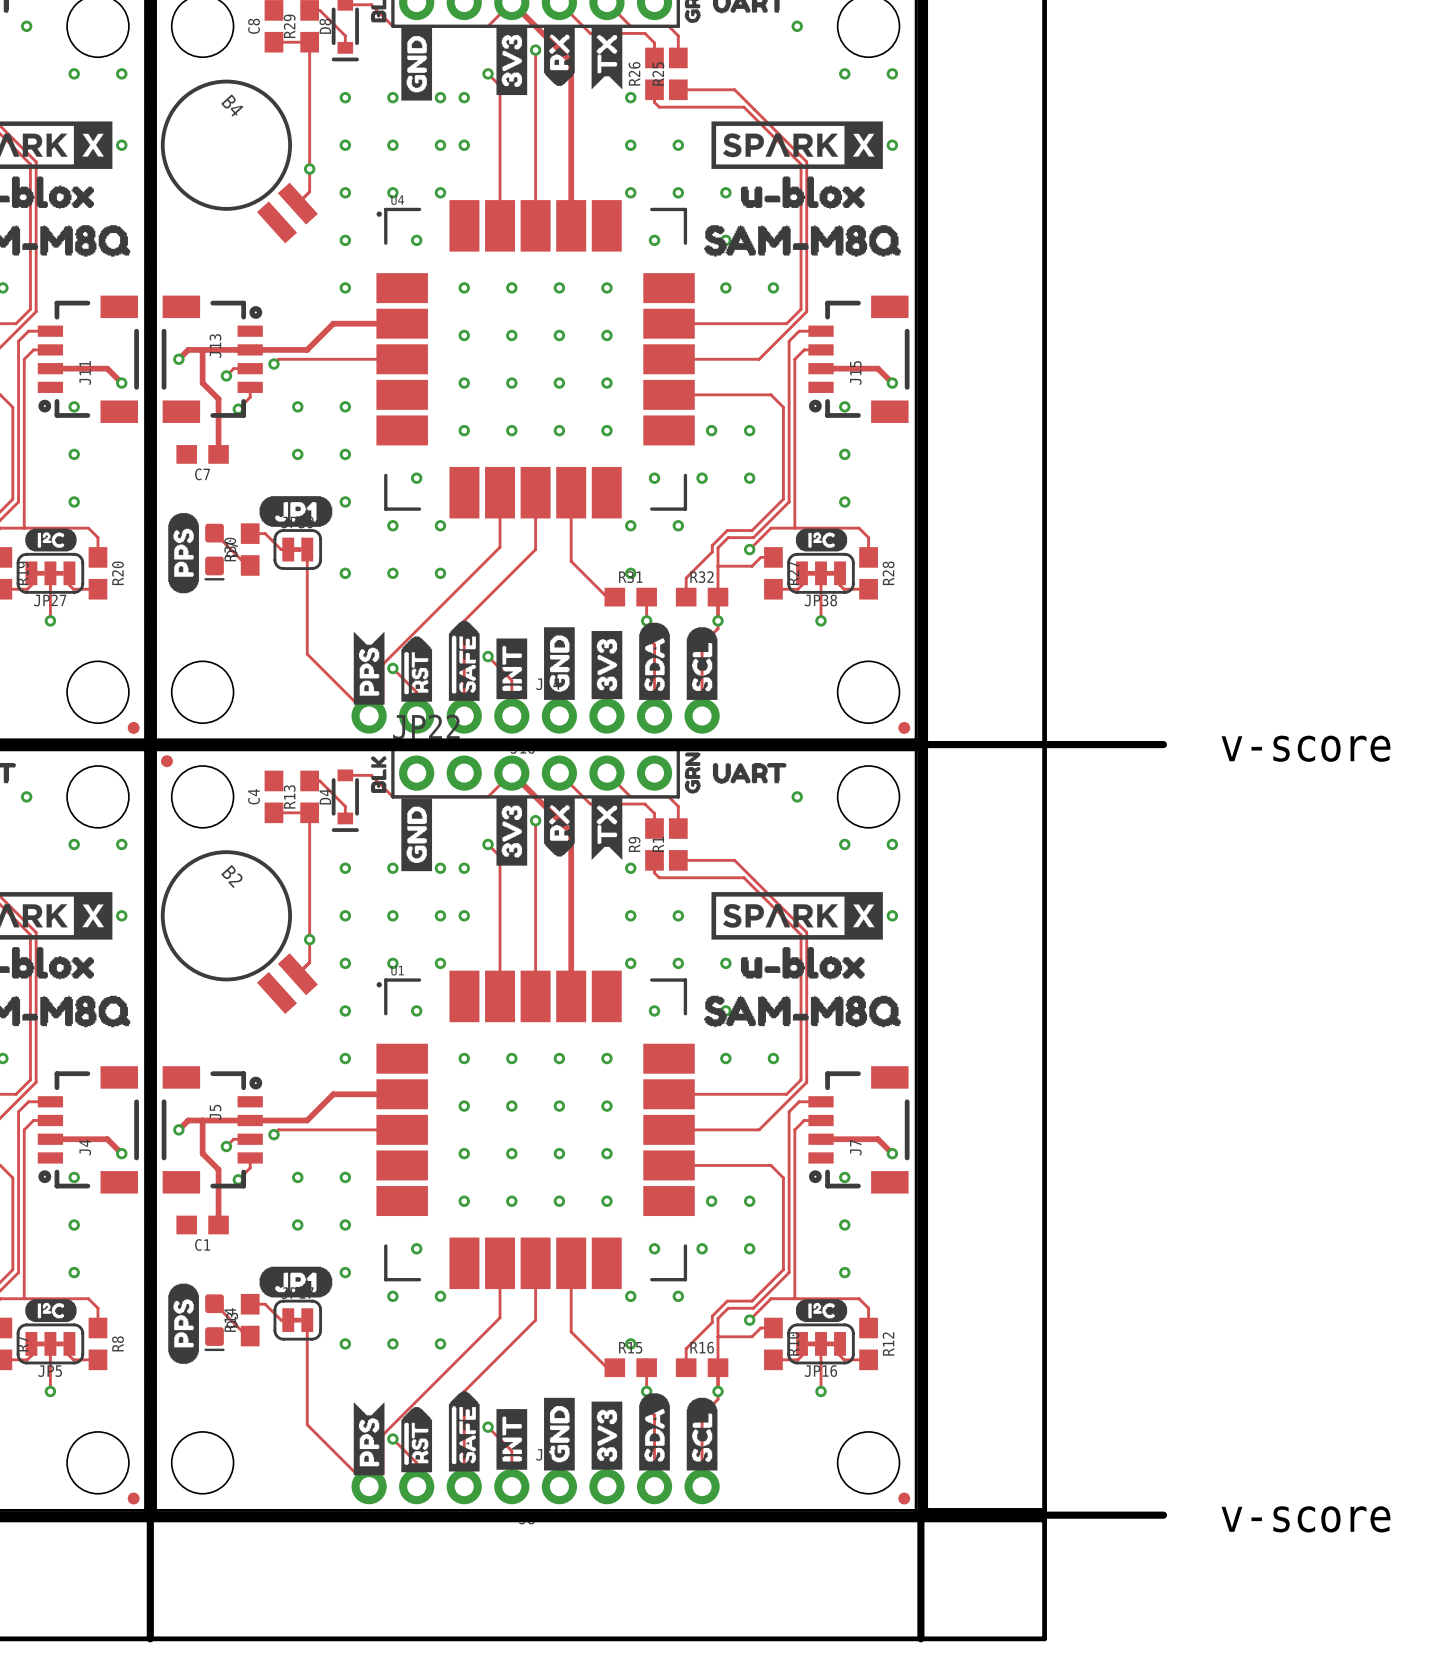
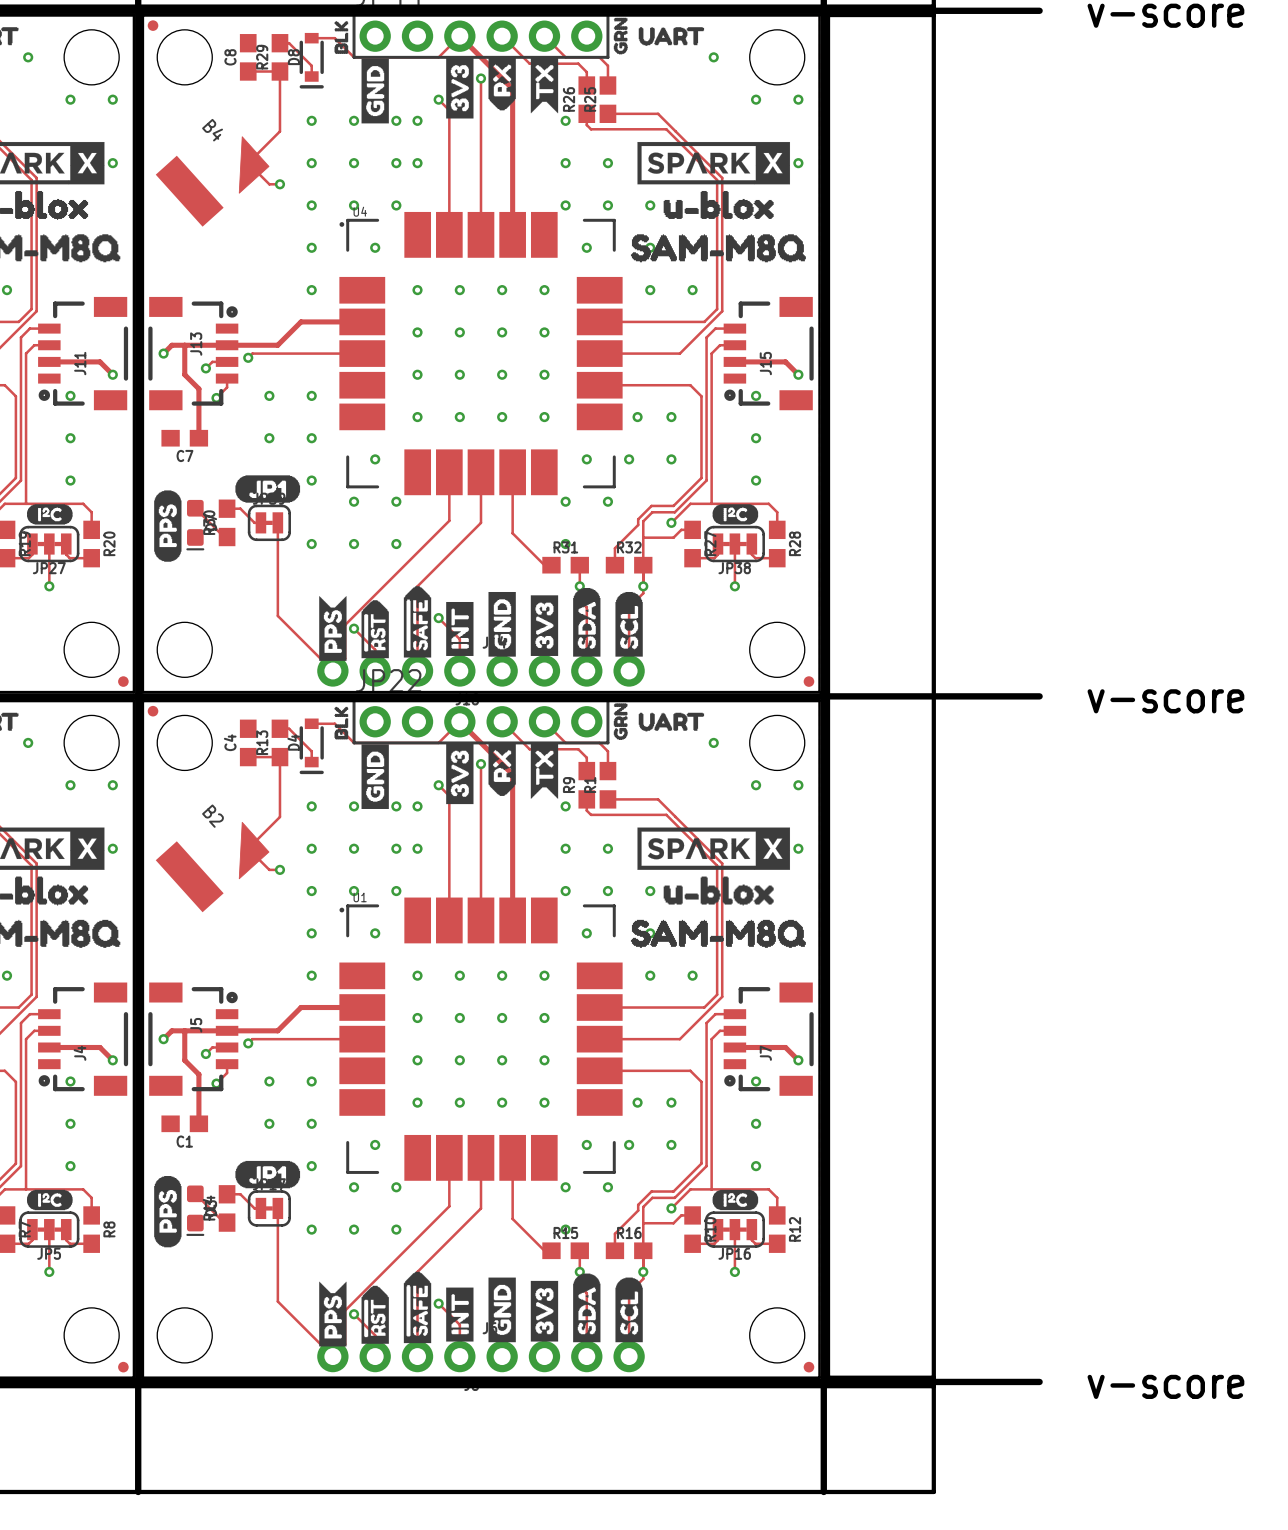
B4 footprint: [160, 79, 318, 244] -> [155, 136, 270, 227]
track: (309, 109) (309, 191) (297, 203) -> (279, 131) (253, 157) (253, 168) (269, 184) (279, 184)
B2 footprint: [160, 850, 318, 1014] -> [155, 821, 270, 913]
track: (309, 880) (309, 962) (297, 974) -> (279, 816) (253, 843) (253, 854) (269, 869) (279, 869)

